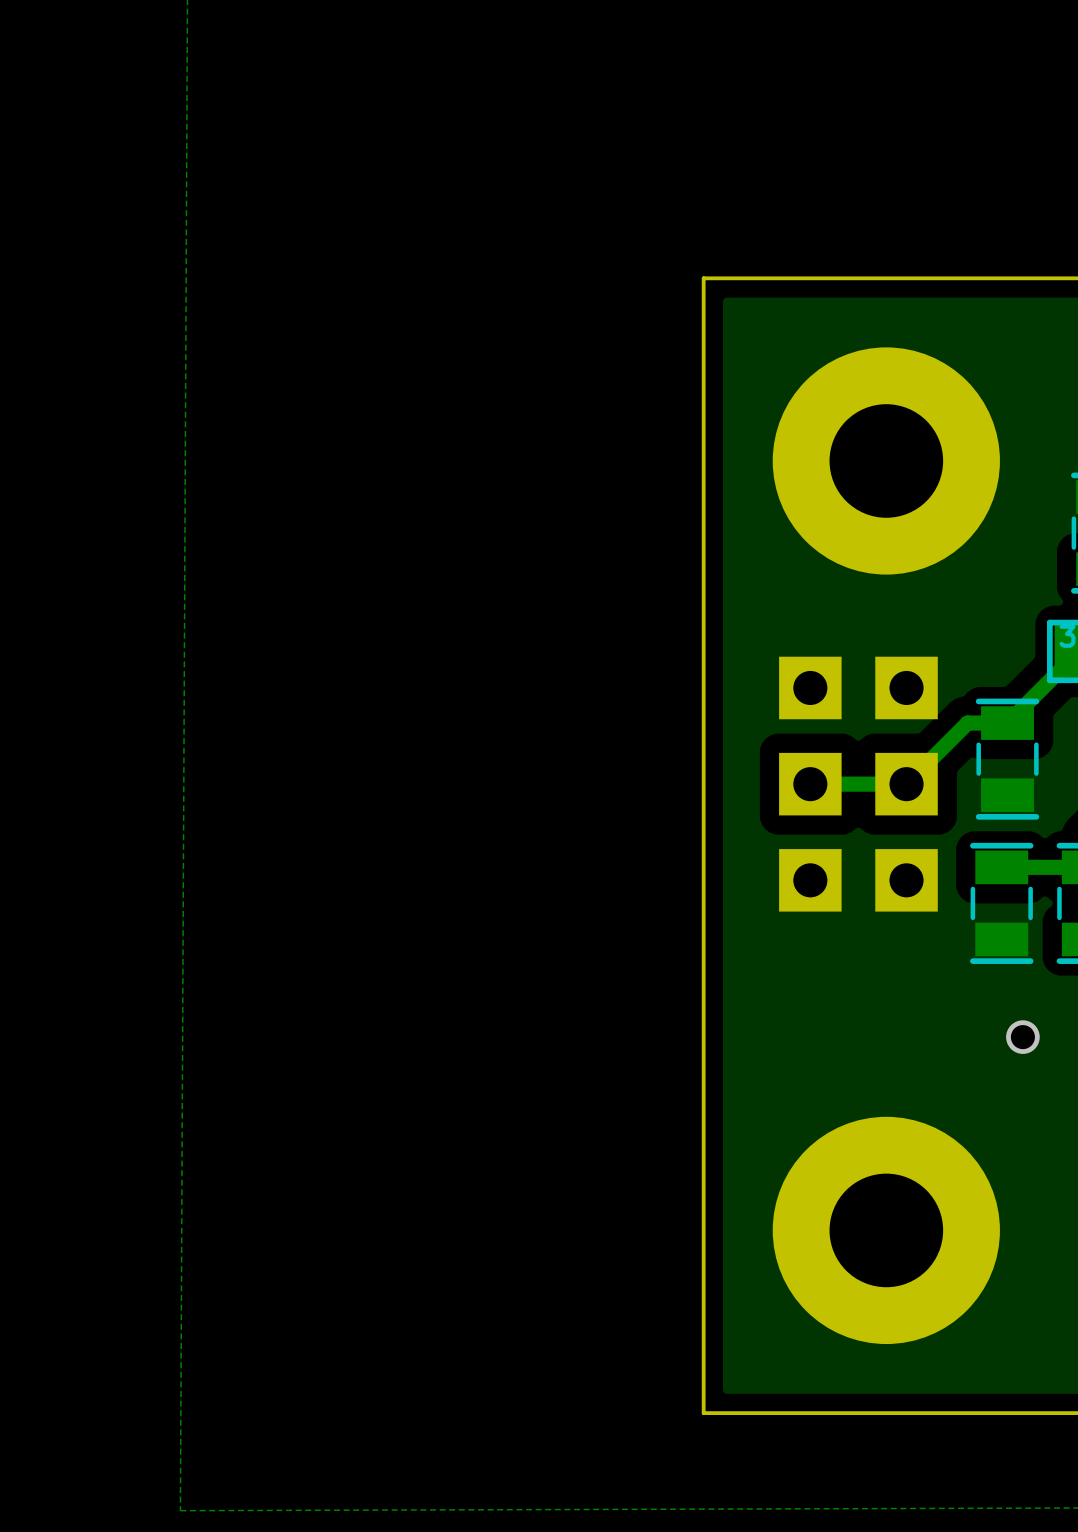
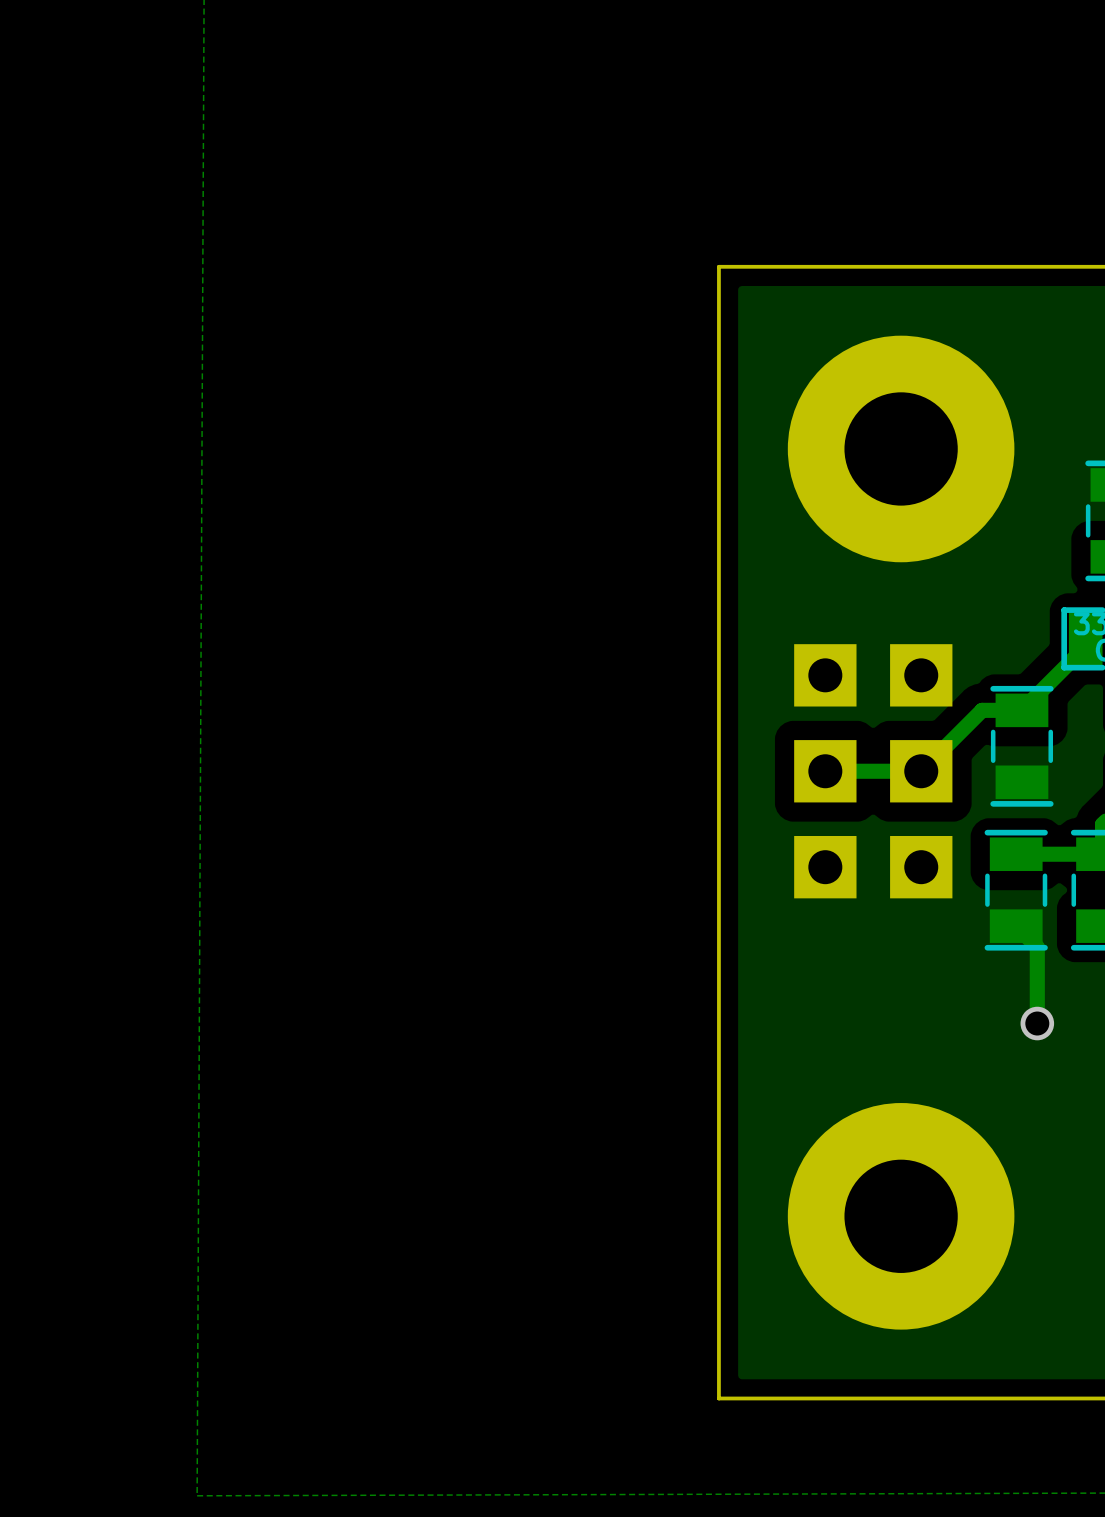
track: none -> (1016, 926) (1037, 947) (1037, 1023)

